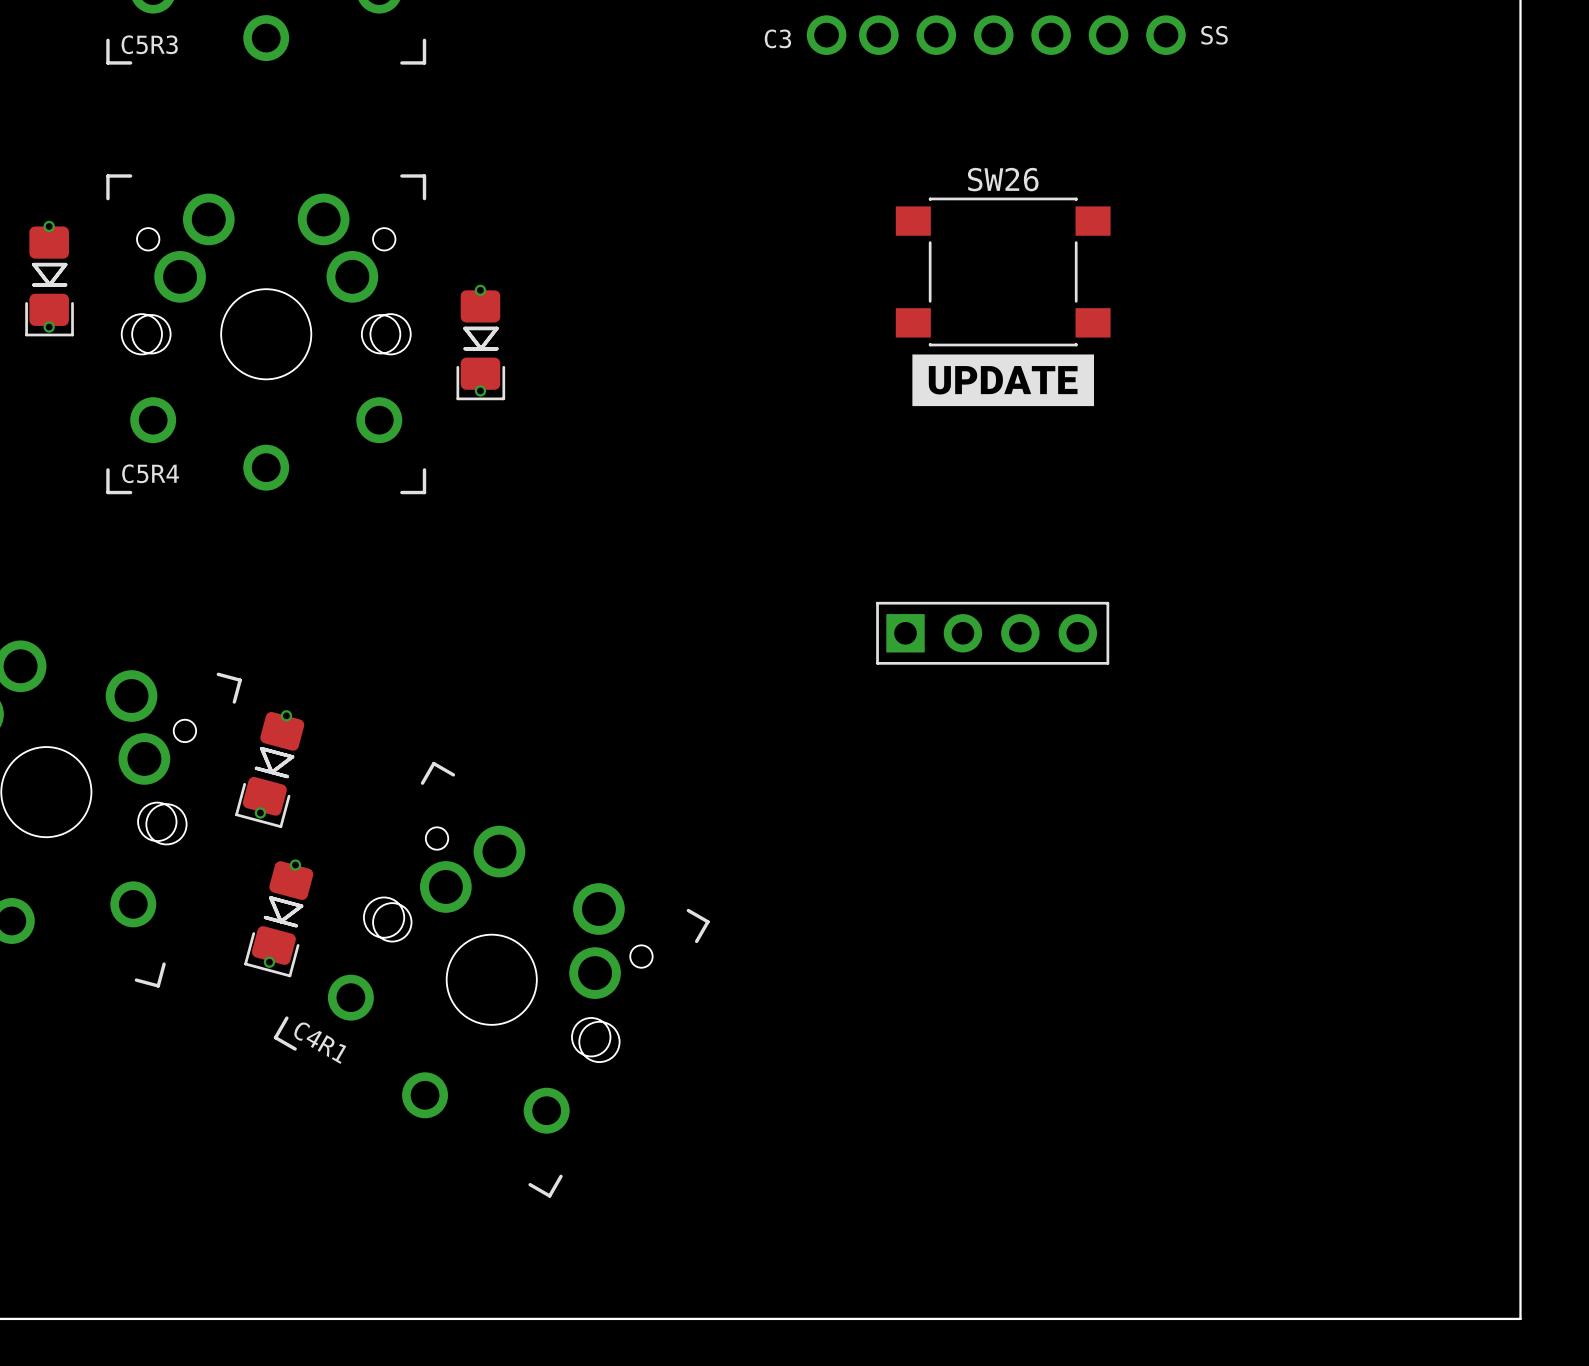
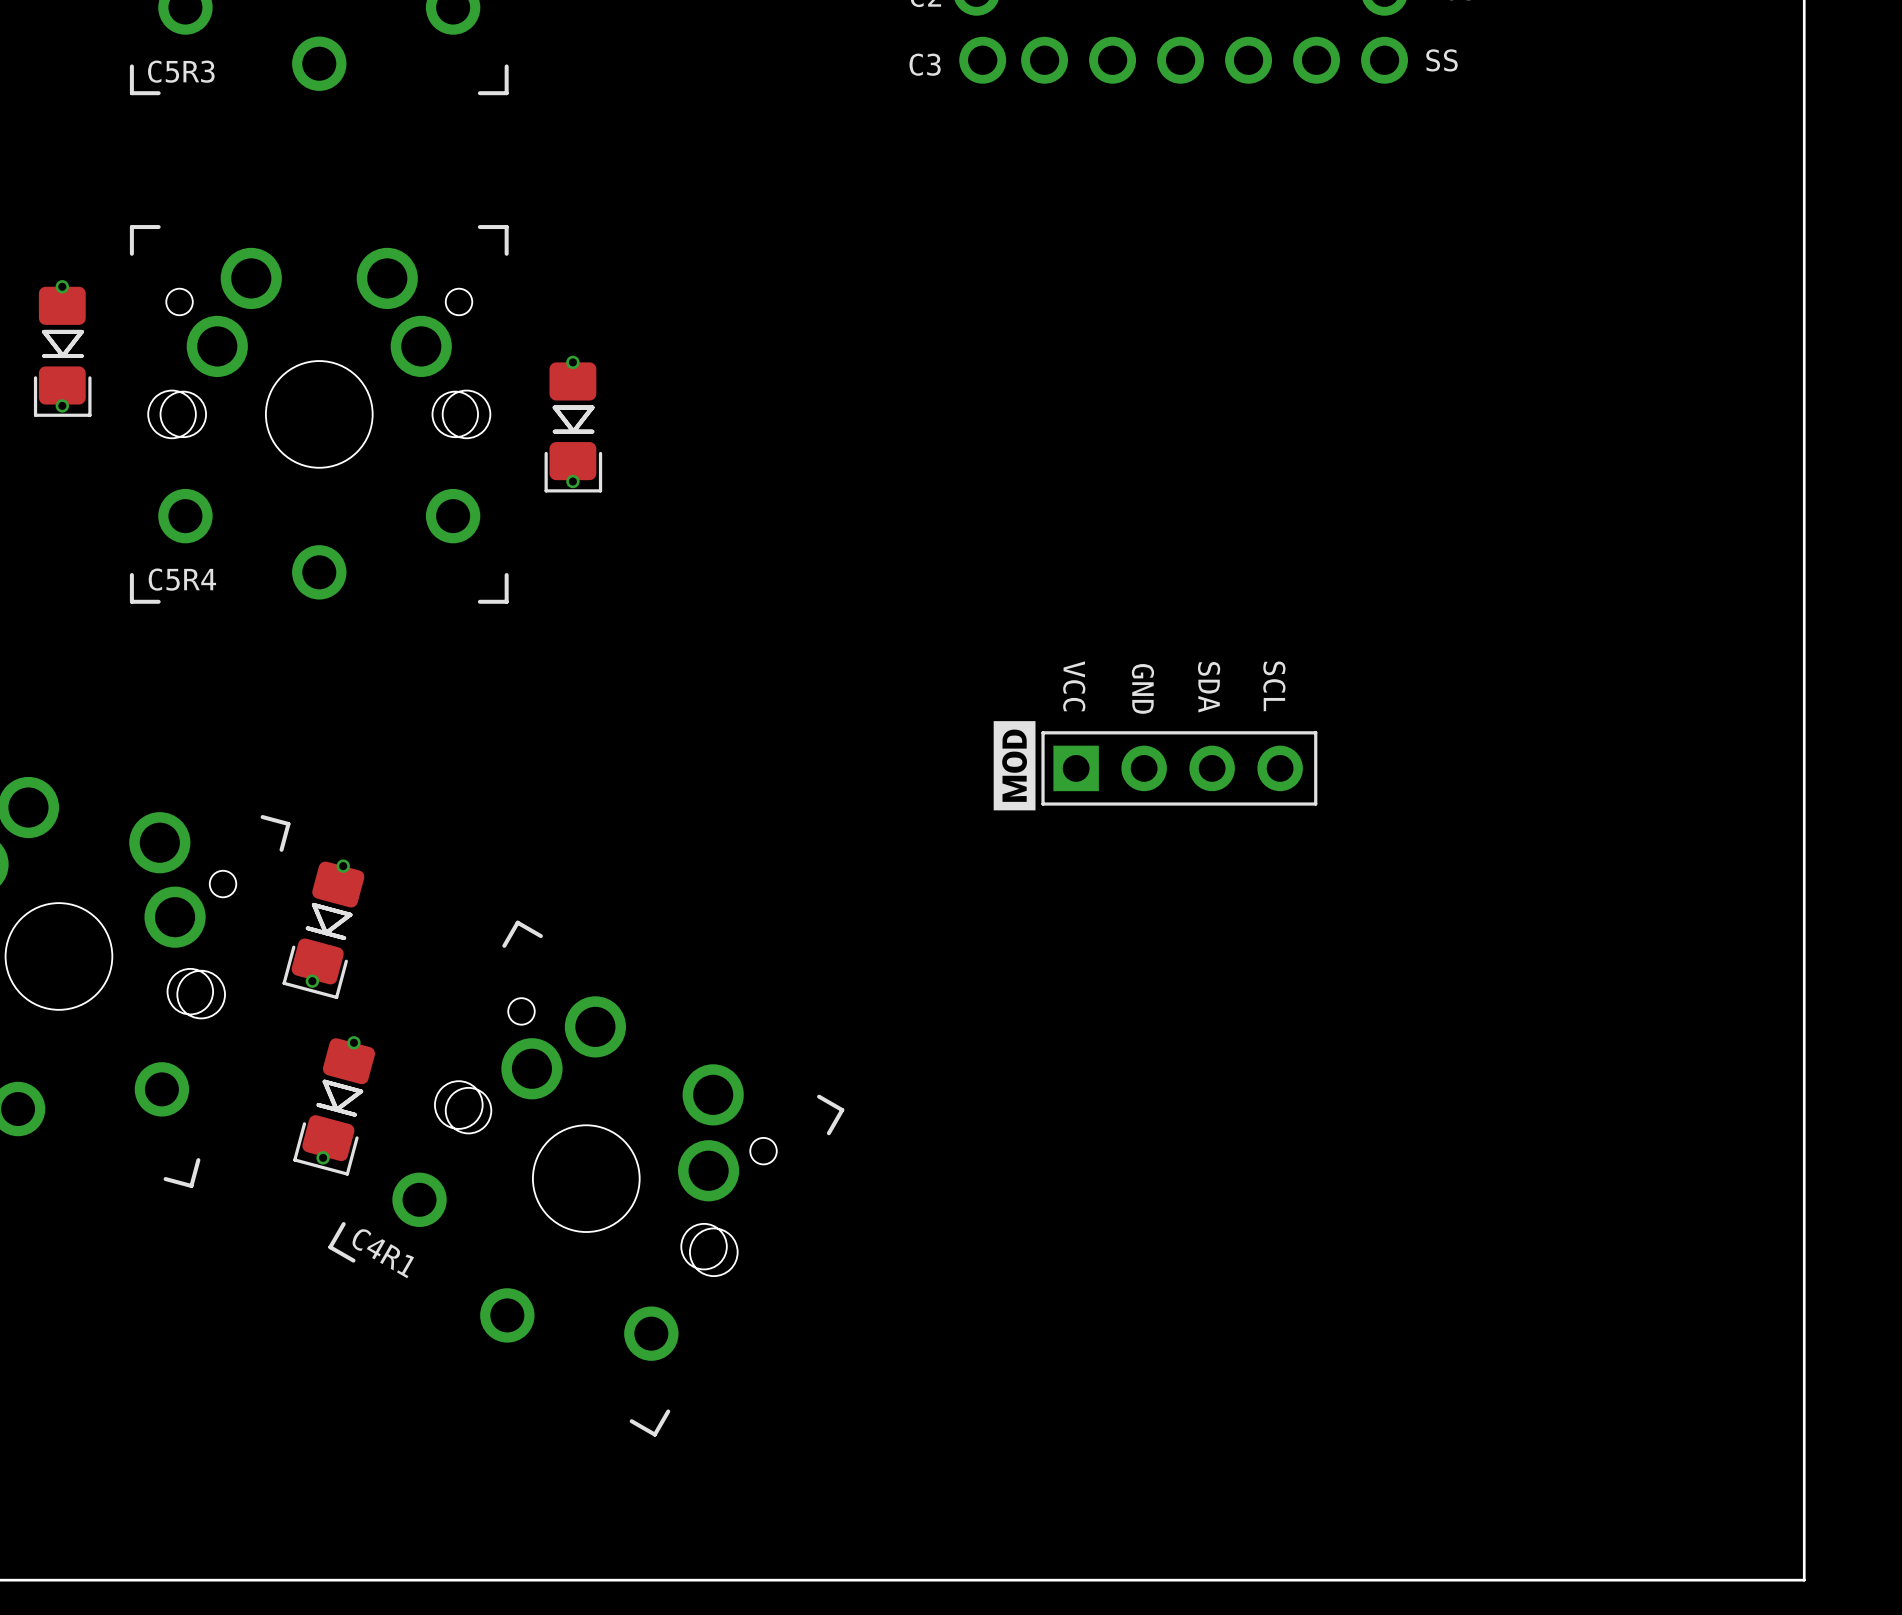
SW26: (1003, 271) -> none
drawing: [912, 354, 1094, 407] -> none
text: none -> VCC (1074, 686)
text: none -> SCL (1274, 686)
text: none -> SDA (1209, 687)
text: none -> GND (1142, 688)
drawing: none -> [993, 721, 1036, 811]

